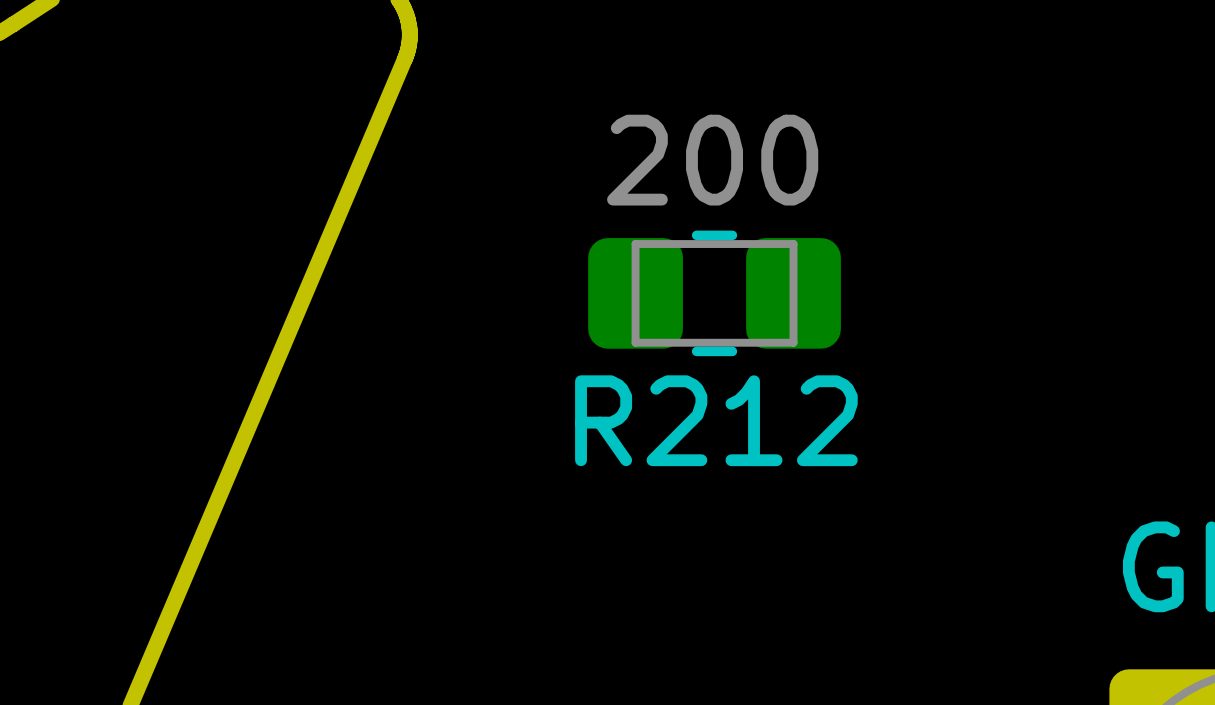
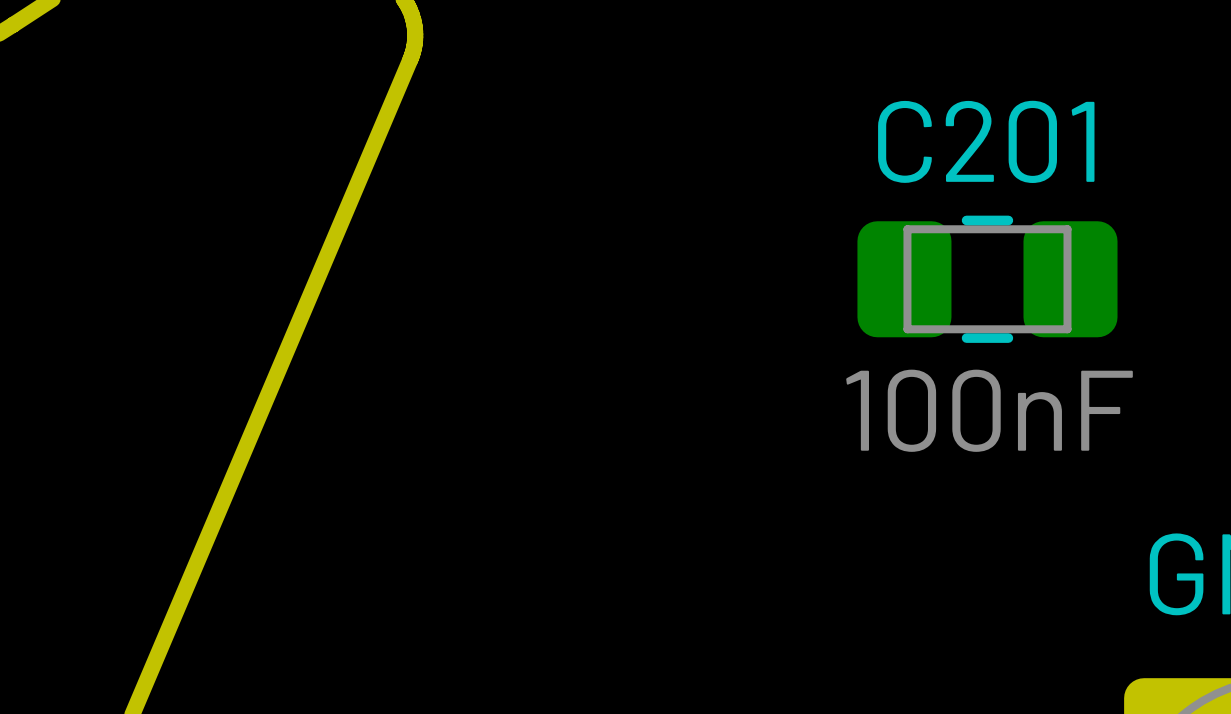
C201: none -> 100nF (987, 279)
R212: 200 (714, 293) -> none

